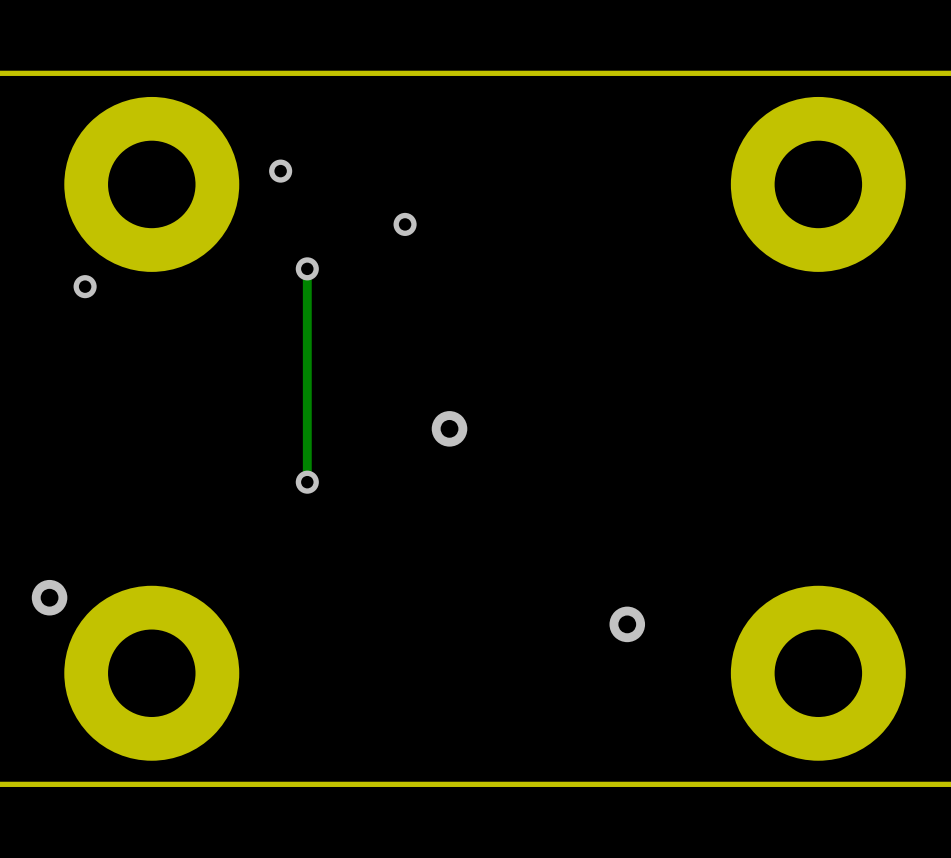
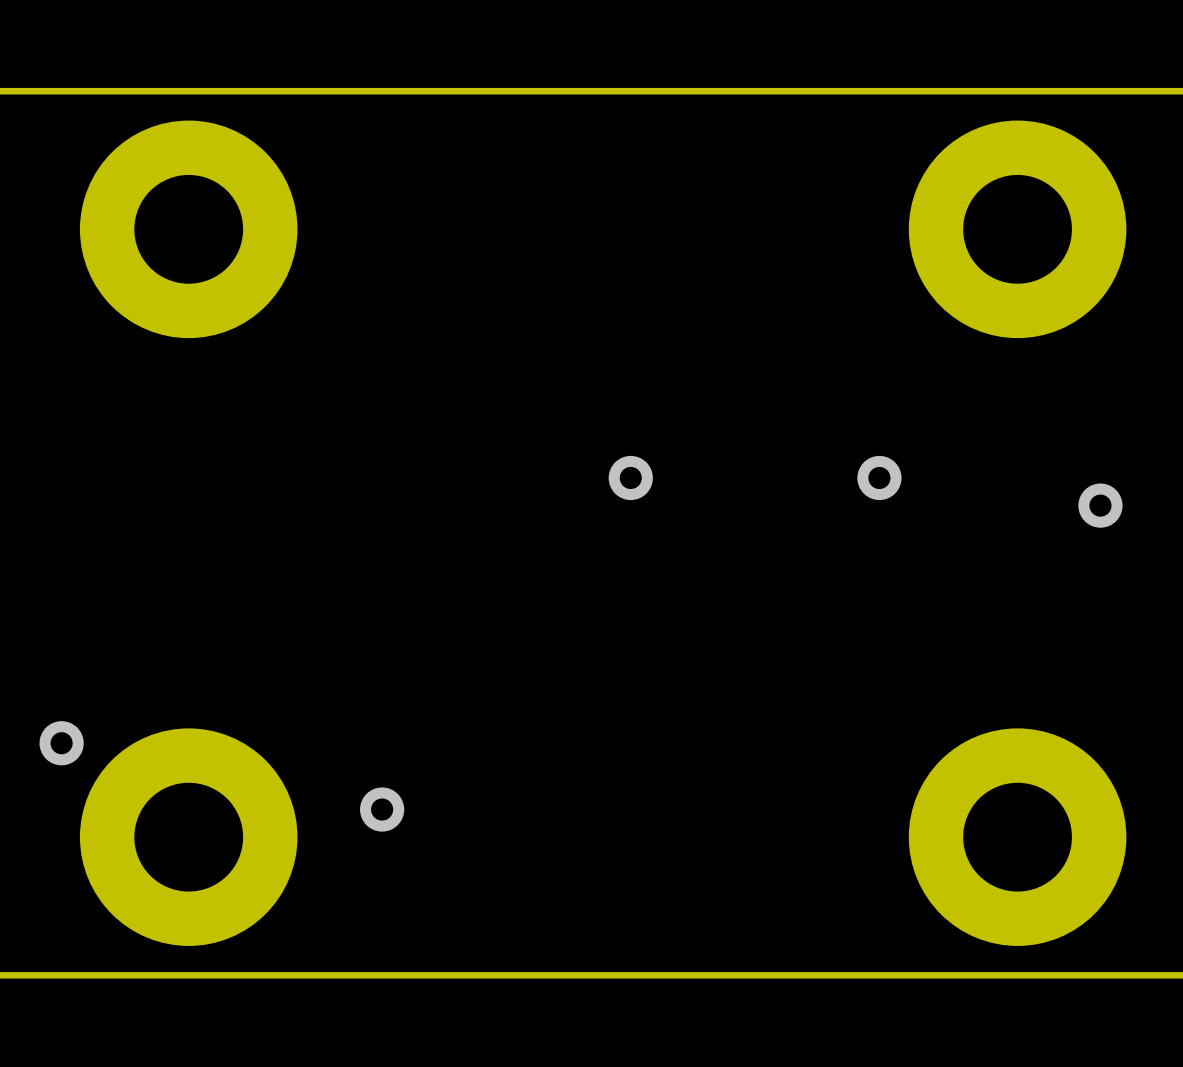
via: (280, 171) -> none
via: (405, 224) -> none
track: (307, 268) (307, 482) -> none
via: (307, 268) -> none
via: (85, 286) -> none
via: none -> (879, 477)
via: none -> (1100, 505)
via position: (449, 428) -> (630, 477)
via: (307, 482) -> none
via: (627, 624) -> none
via: none -> (382, 809)

